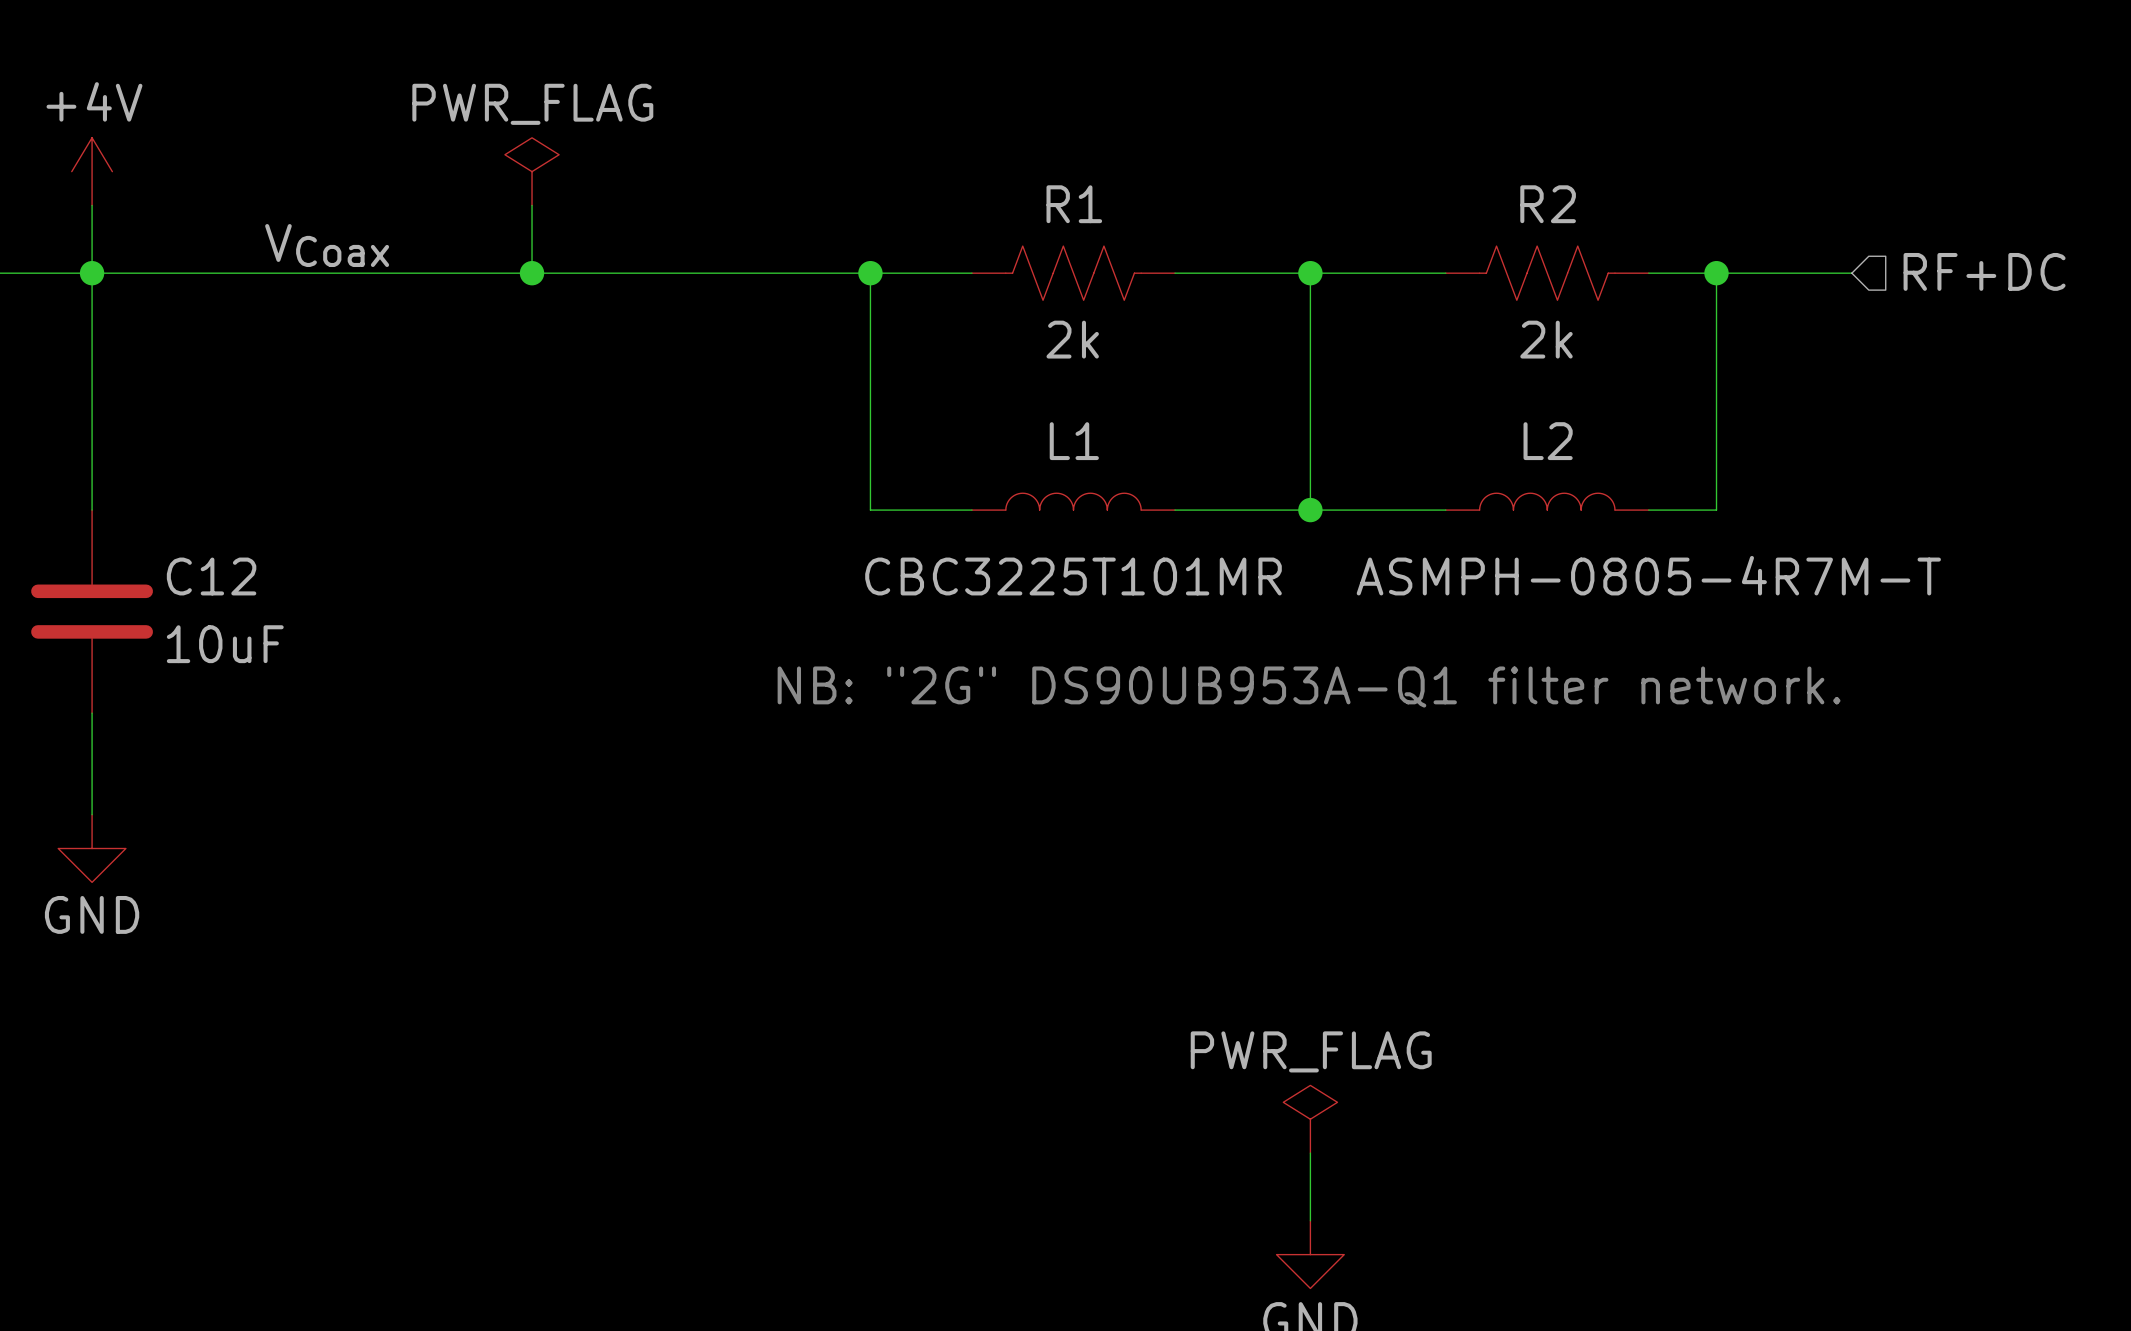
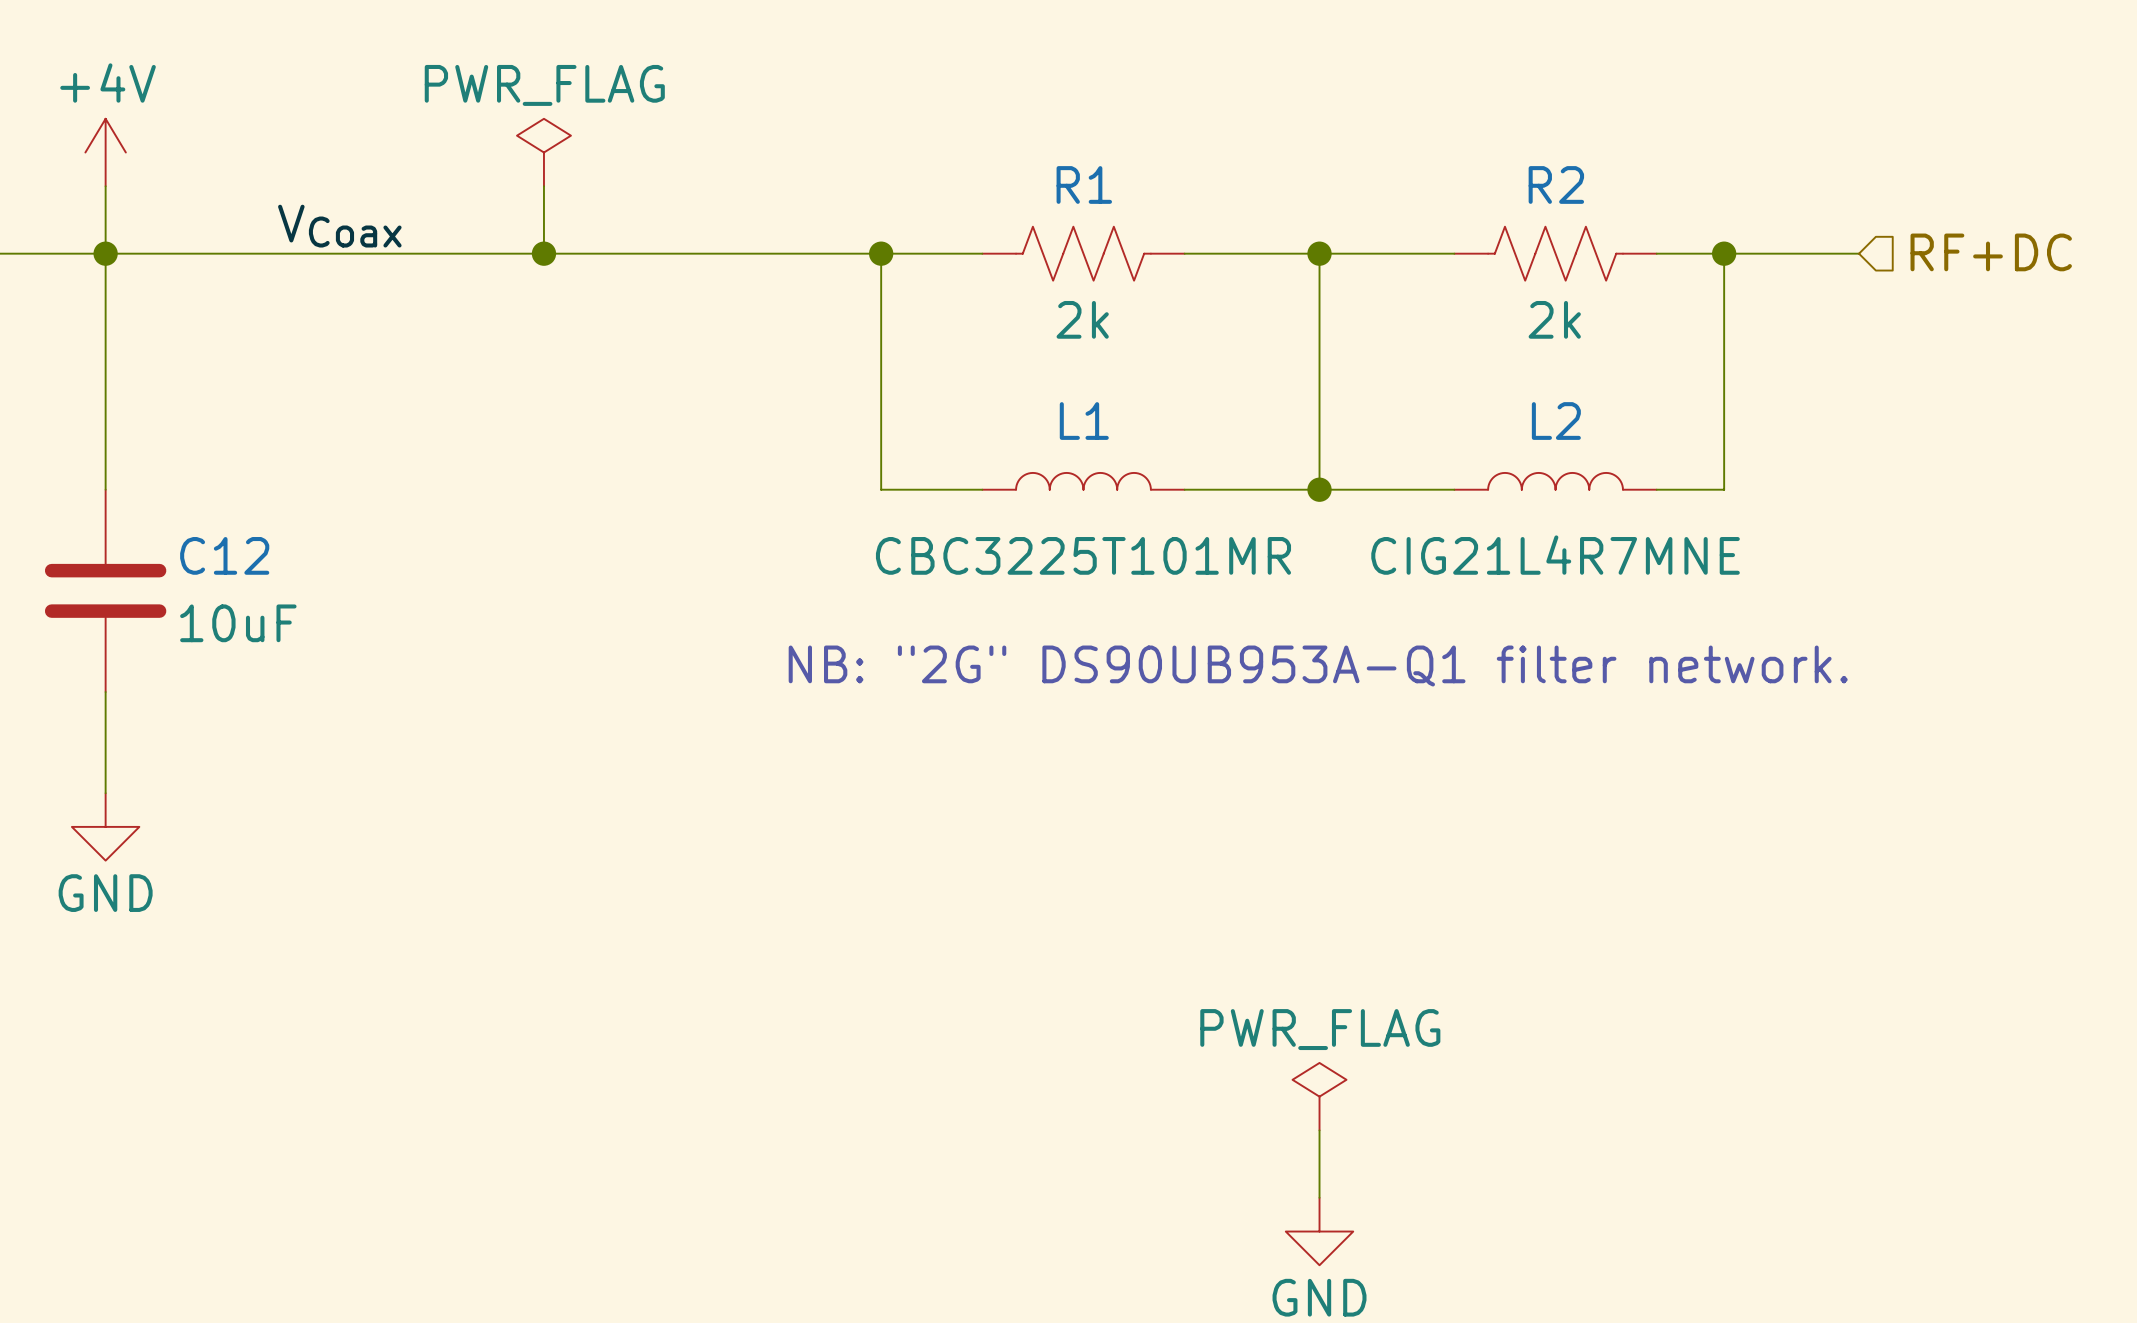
L2 value: ASMPH-0805-4R7M-T (1648, 575) -> CIG21L4R7MNE (1555, 555)

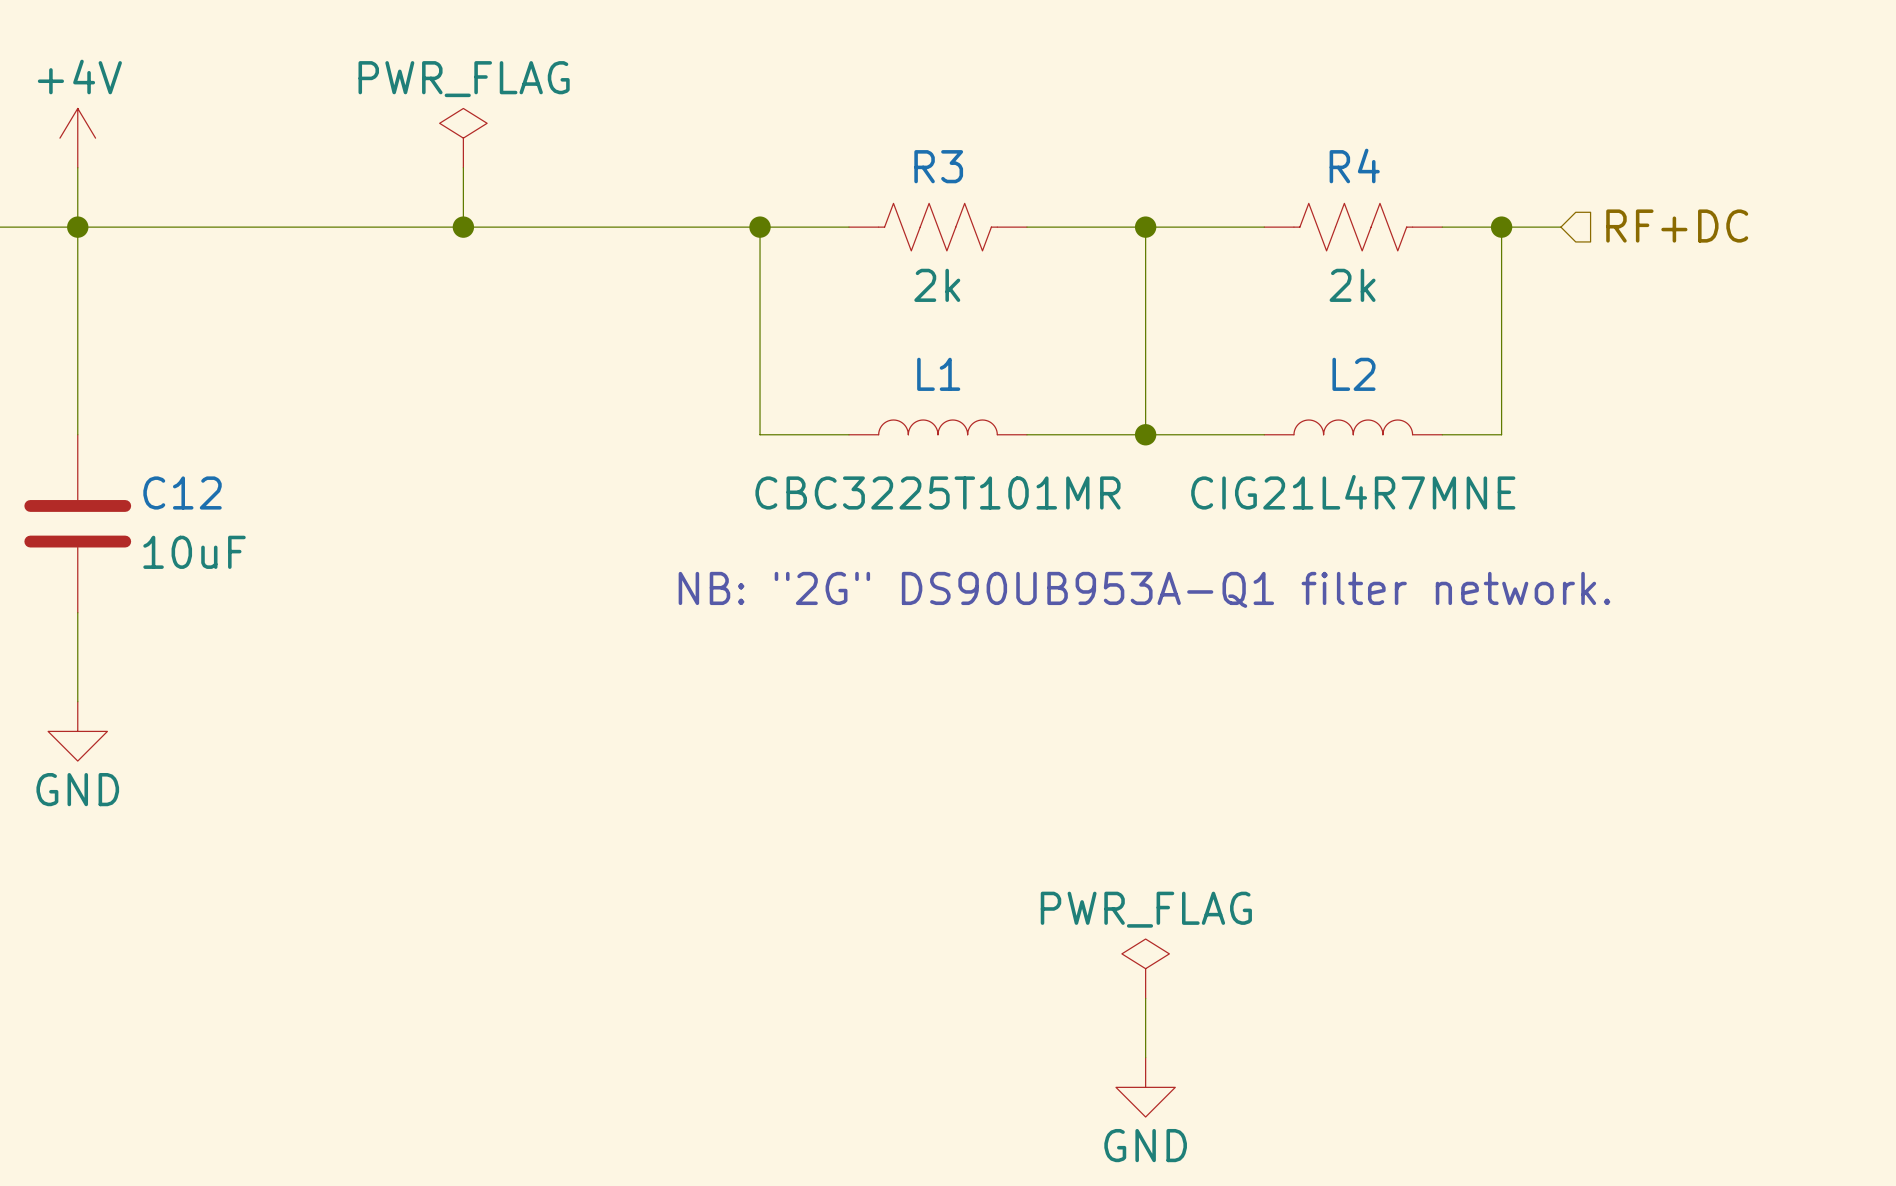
R1 name: R1 (1084, 184) -> R3 (938, 166)
R2 name: R2 (1556, 184) -> R4 (1354, 165)
label: VCoax (339, 226) -> none
hierarchical label position: RF+DC (1991, 252) -> RF+DC (1677, 226)
wire: (1791, 253) (1859, 253) -> none

